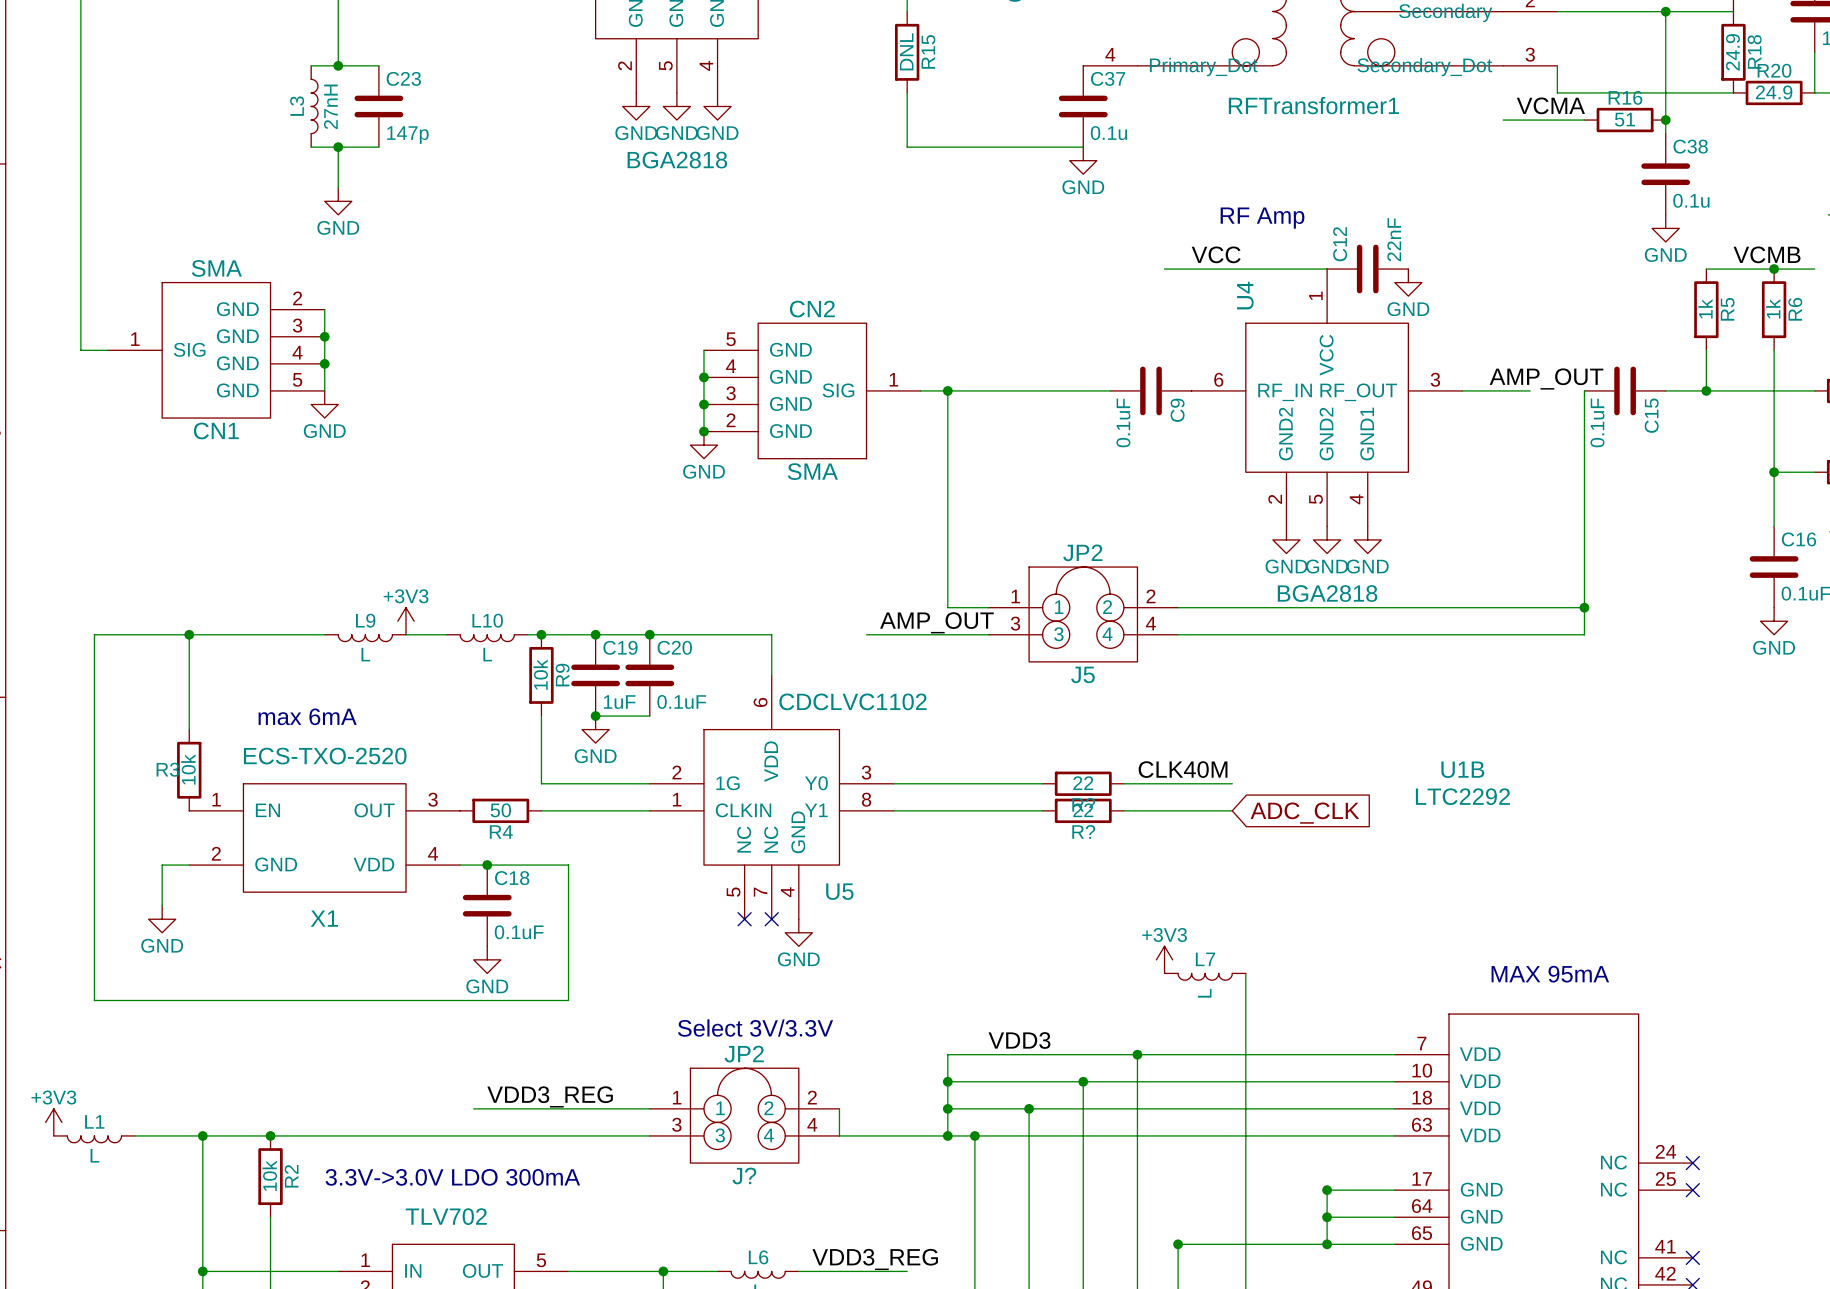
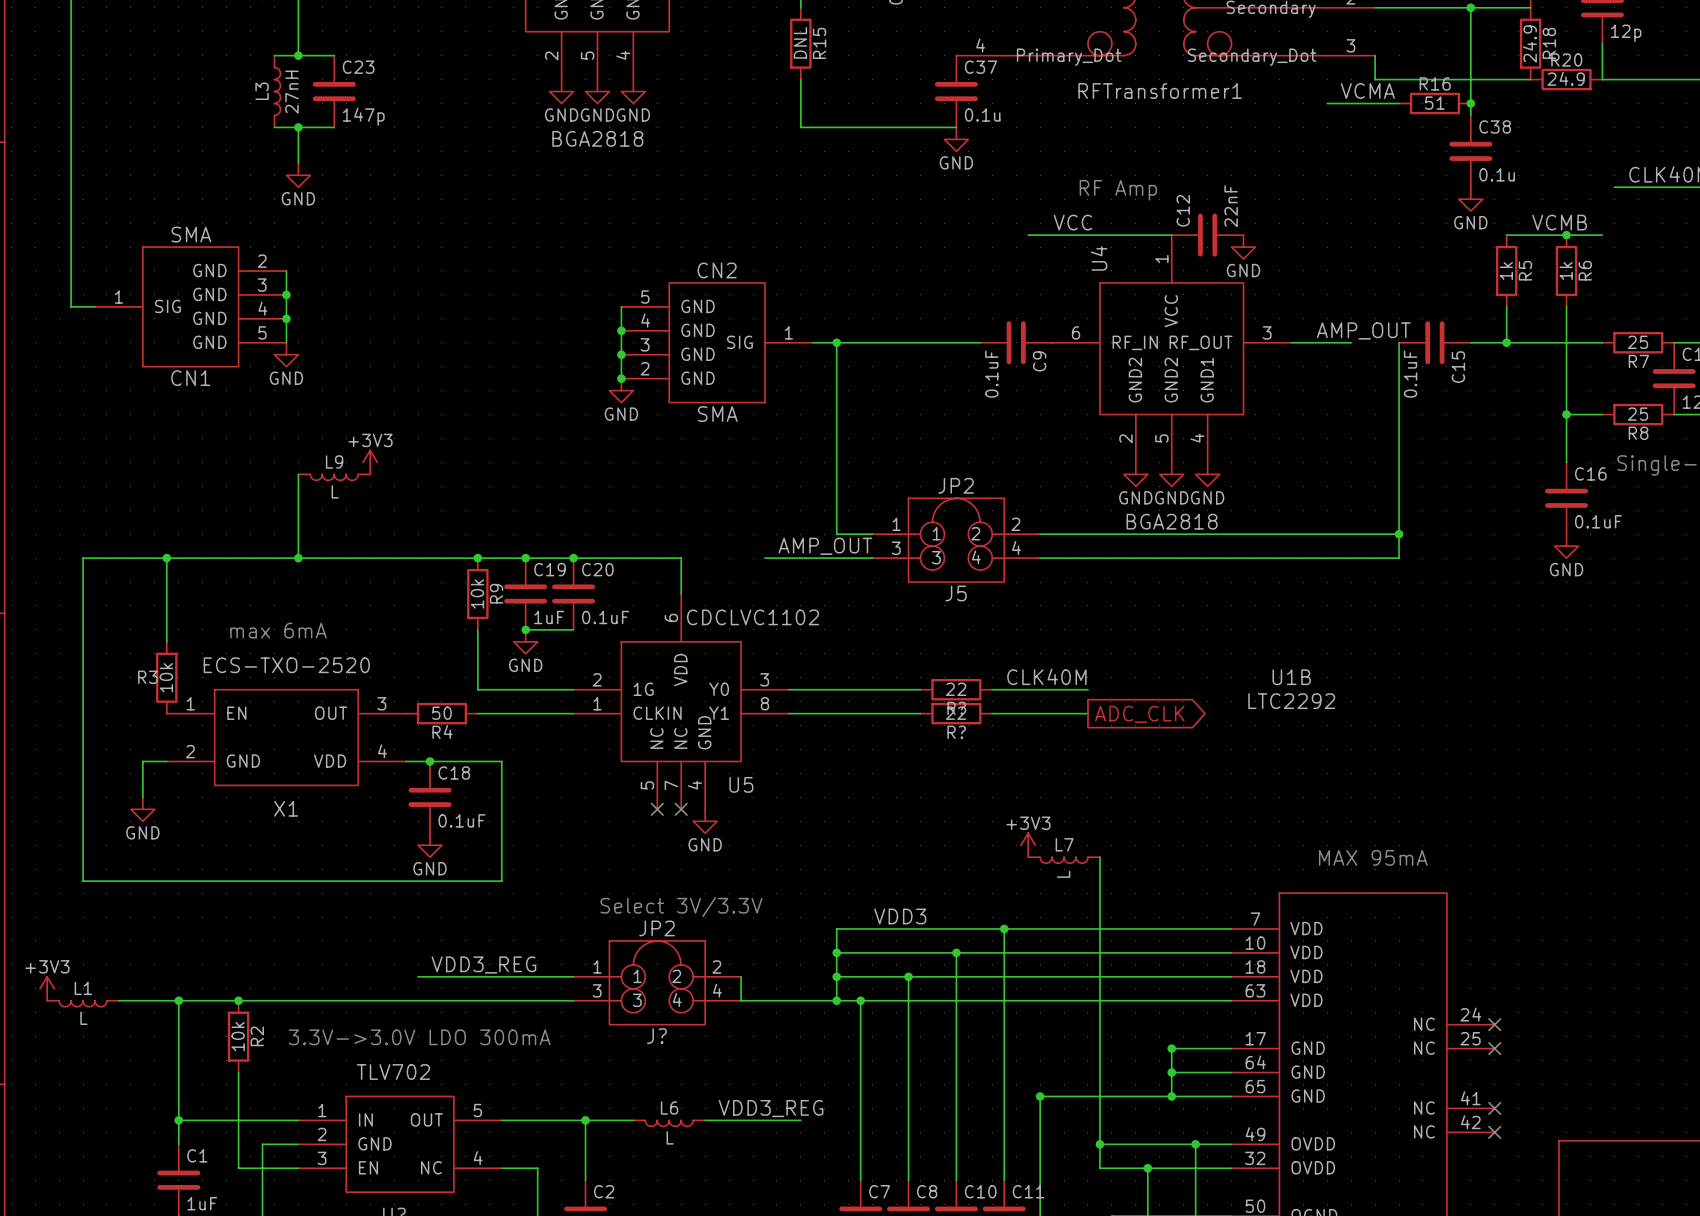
wire: none -> (298, 474) (298, 558)
power symbol position: +3V3 (405, 621) -> +3V3 (370, 462)
wire: none -> (286, 558) (358, 558)
junction: none -> (298, 558)
wire: none -> (394, 558) (465, 558)
L9 position: (365, 638) -> (334, 477)
L10: L (487, 638) -> none
global label shape: input (1304, 813) -> output (1139, 714)

